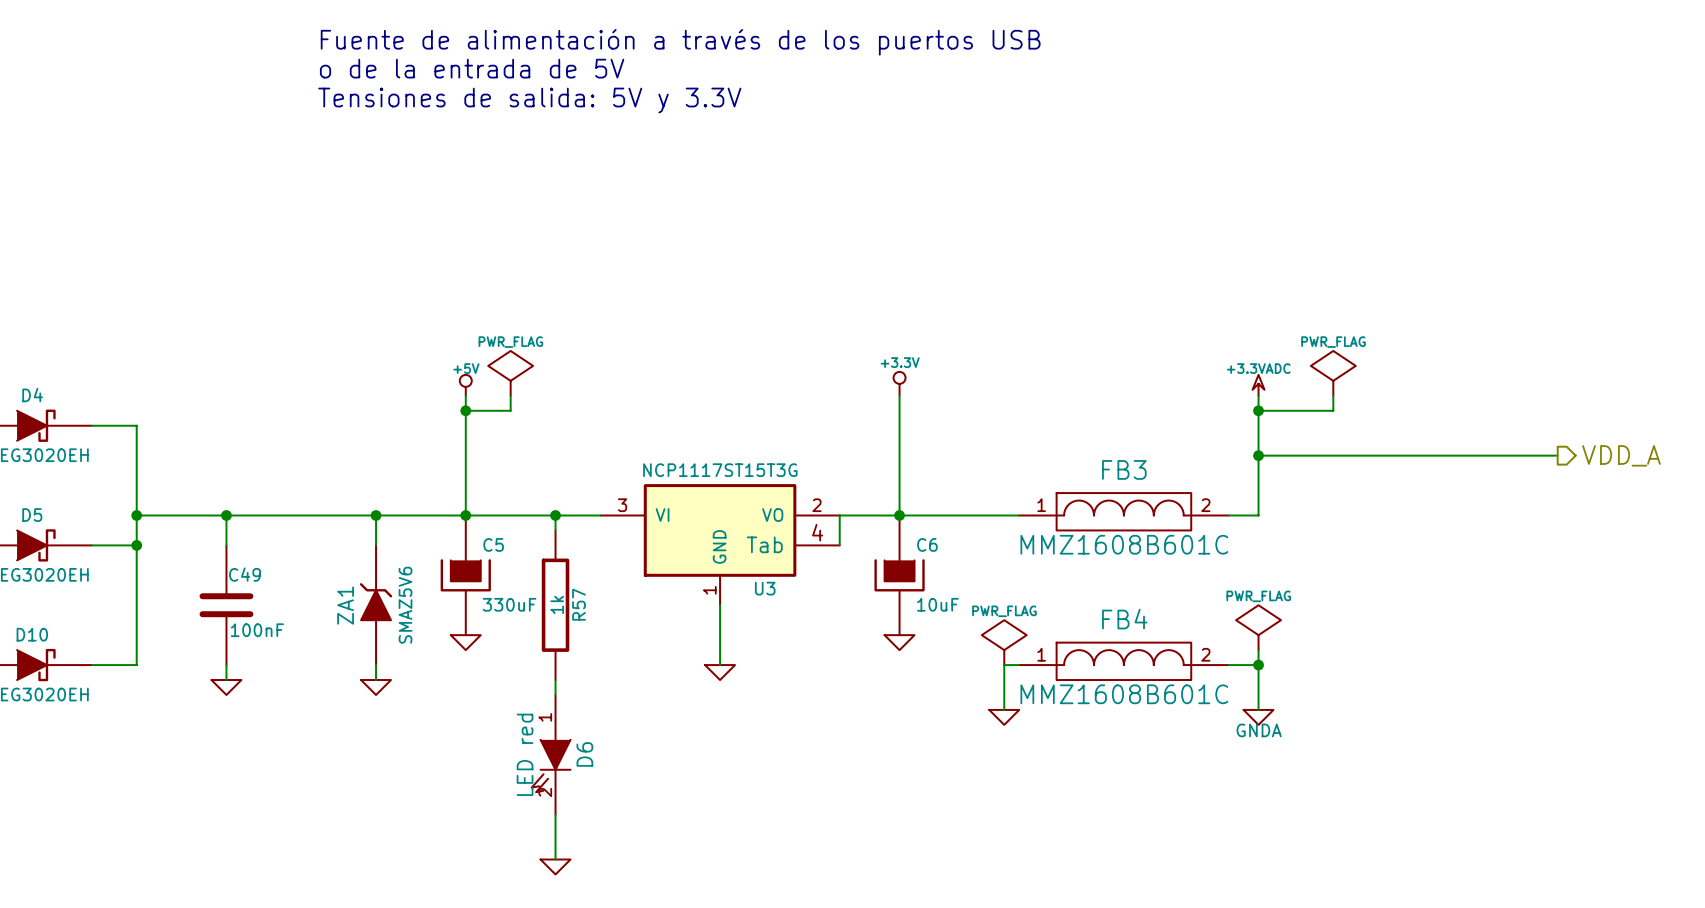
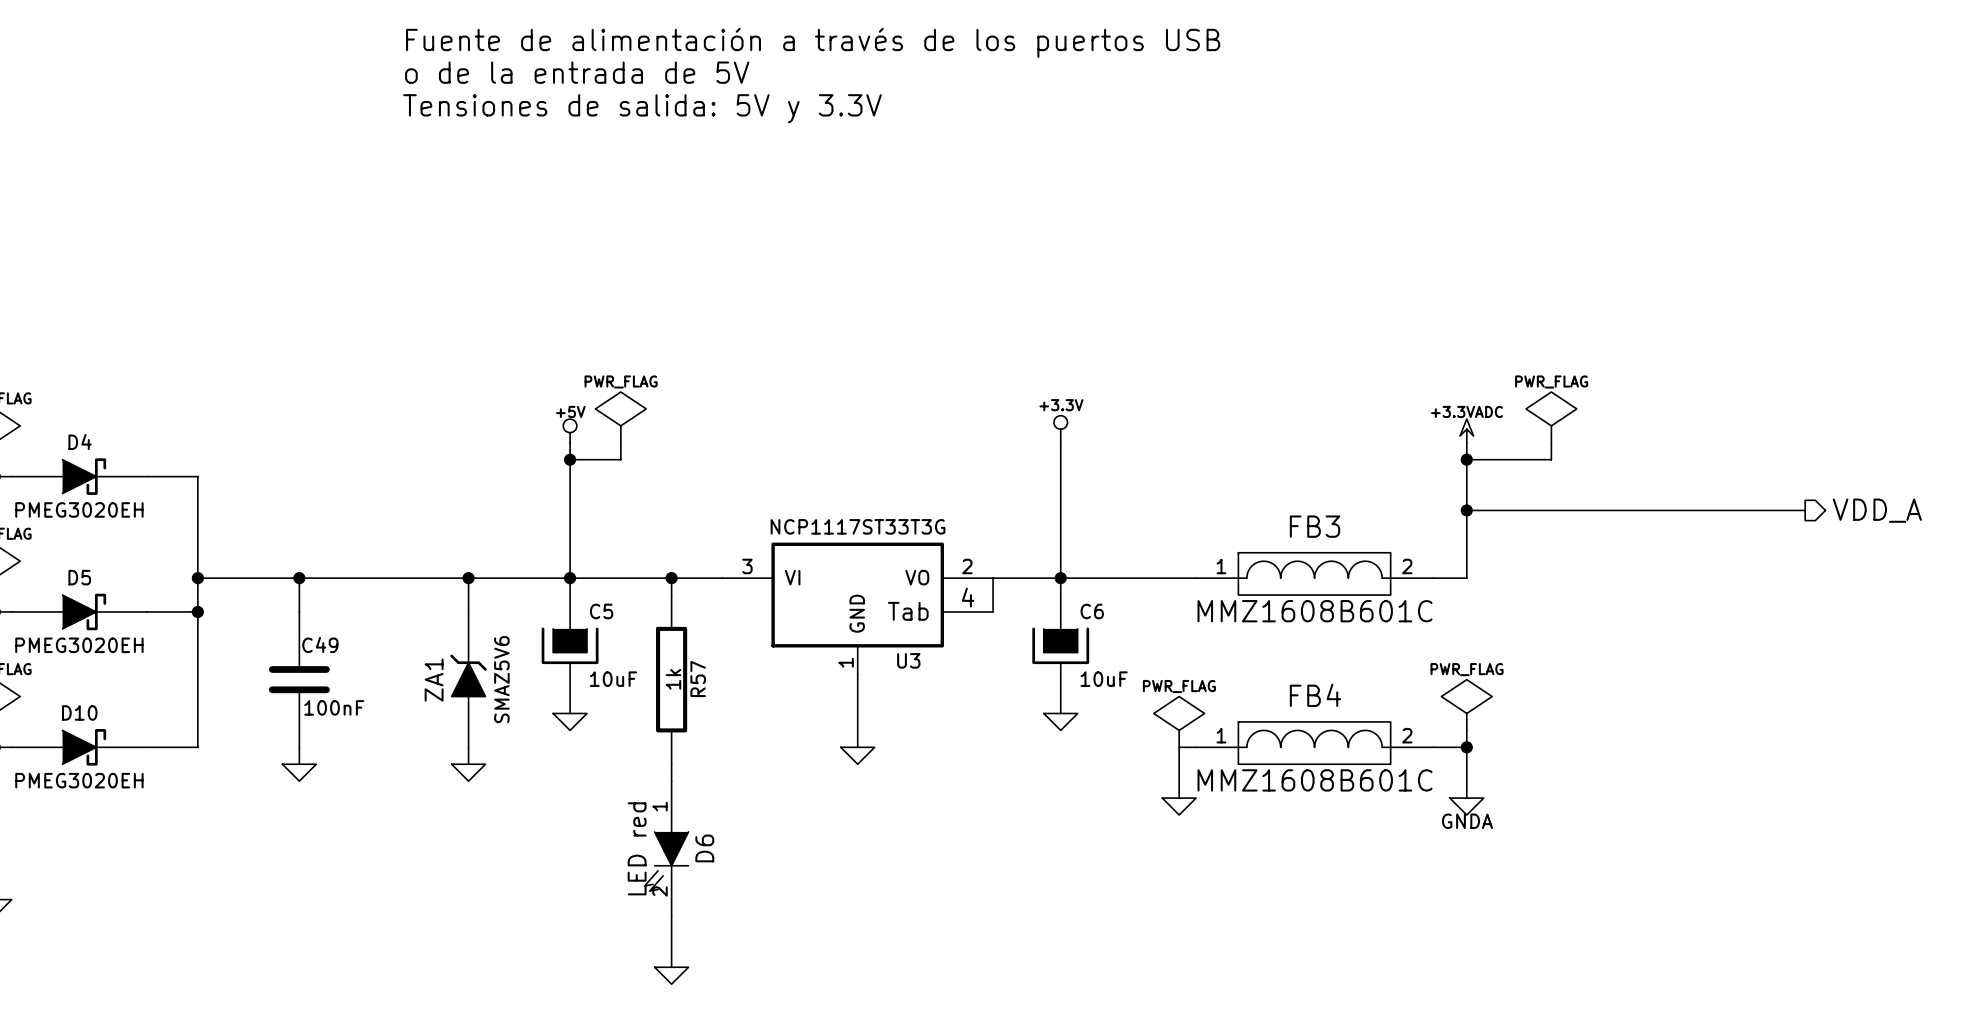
U3 value: NCP1117ST15T3G (720, 470) -> NCP1117ST33T3G (858, 526)
C5 value: 330uF (509, 604) -> 10uF (613, 679)

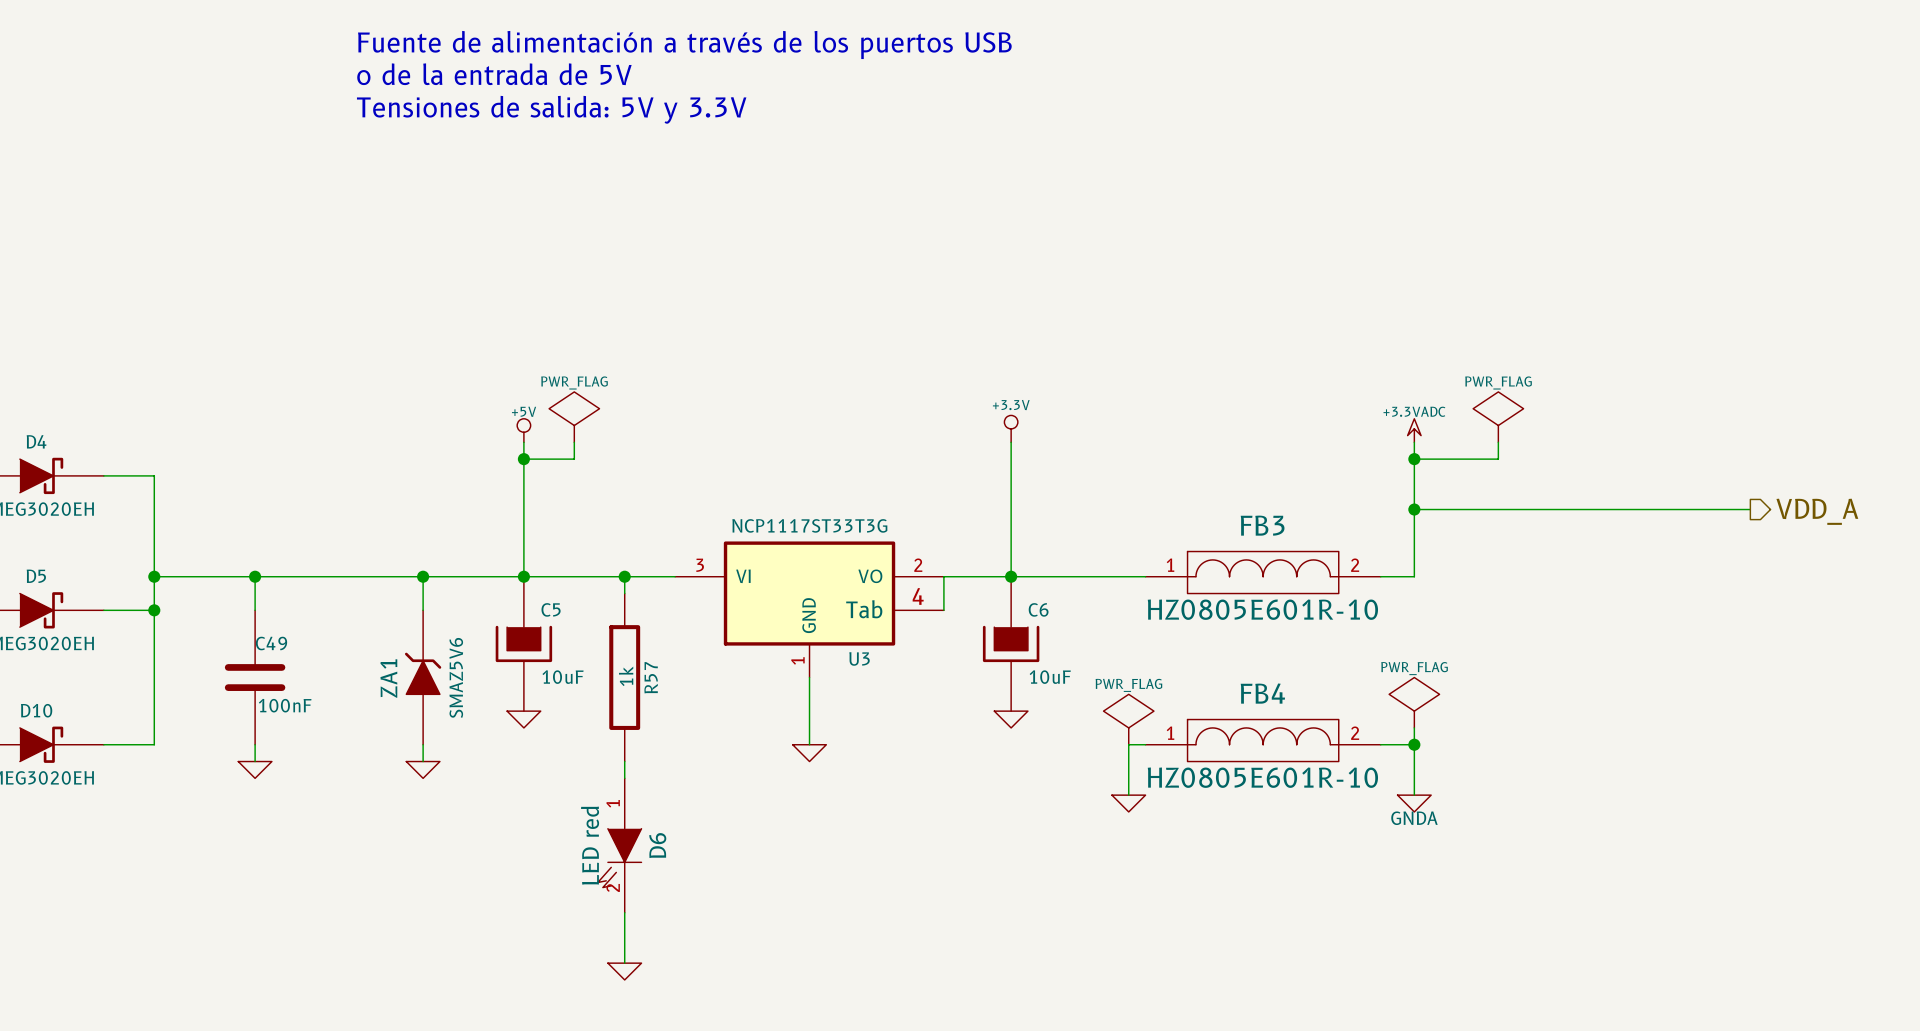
FB3 value: MMZ1608B601C (1315, 611) -> HZ0805E601R-10 (1262, 609)
FB4 value: MMZ1608B601C (1315, 780) -> HZ0805E601R-10 (1262, 777)

